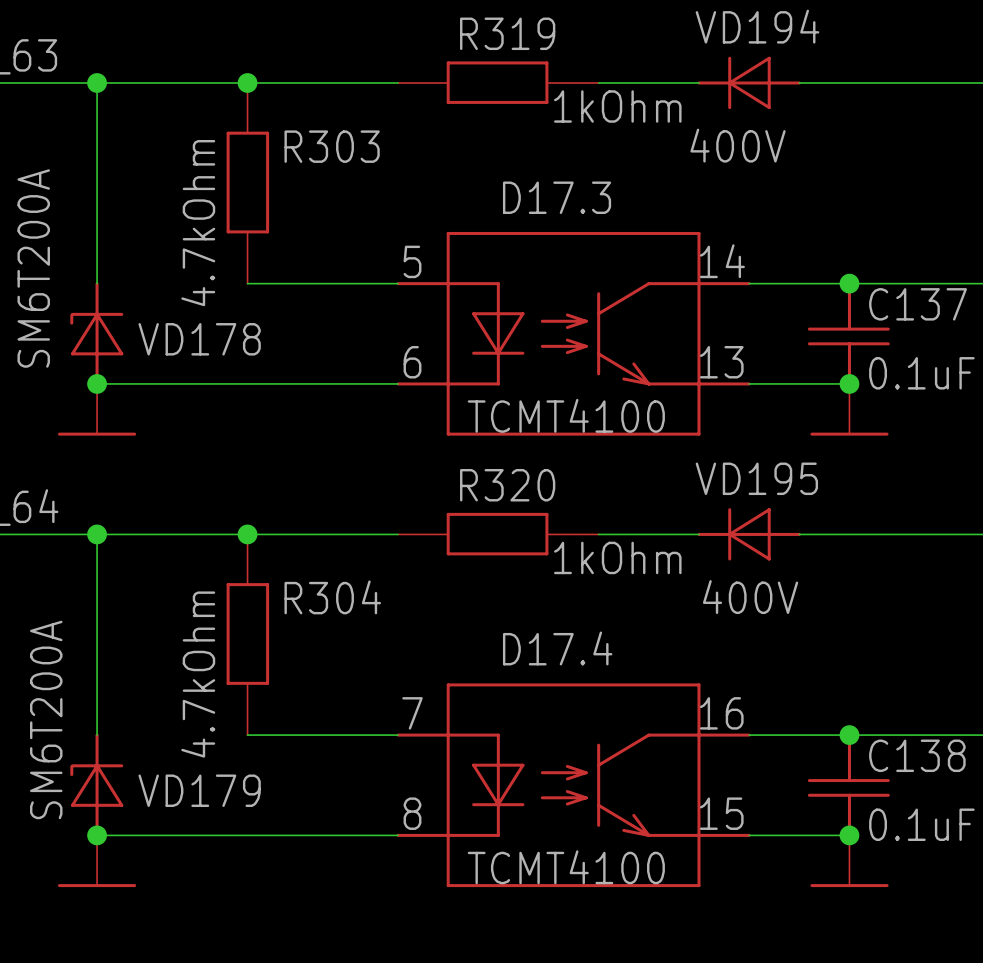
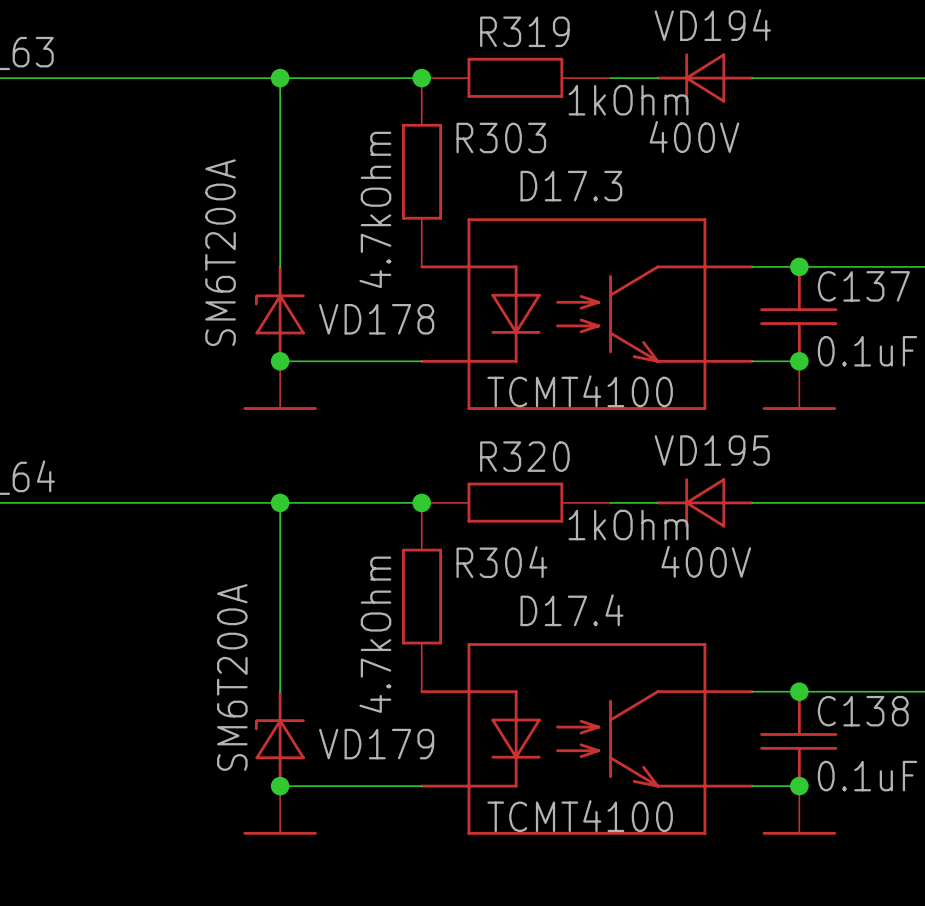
R319 position: (498, 82) -> (516, 77)
wire: (97, 83) (97, 283) -> (280, 78) (280, 266)
junction: (97, 83) -> none
junction position: (247, 83) -> (280, 78)
junction: none -> (421, 78)
R303 position: (247, 183) -> (422, 172)
D17.3 pin number: 5 (412, 261) -> none
D17.3 pin number: 14 (722, 261) -> none
wire: (247, 283) (398, 283) -> none
VD178 position: (96, 333) -> (279, 314)
D17.3 position: (573, 333) -> (586, 314)
D17.3 pin number: 6 (412, 362) -> none
D17.3 pin number: 13 (721, 362) -> none
wire: (97, 383) (297, 383) -> none
junction: (97, 383) -> none
junction: none -> (280, 361)
power symbol position: (97, 409) -> (280, 385)
wire: (97, 534) (97, 735) -> (280, 502) (280, 691)
junction: (97, 534) -> none
junction position: (247, 534) -> (280, 502)
junction: none -> (421, 502)
R320 position: (498, 534) -> (516, 502)
R304 position: (247, 634) -> (422, 597)
D17.4 pin number: 7 (412, 713) -> none
D17.4 pin number: 16 (721, 713) -> none
wire: (247, 735) (398, 735) -> none
VD179 position: (96, 785) -> (279, 738)
D17.4 position: (573, 785) -> (586, 738)
D17.4 pin number: 8 (412, 813) -> none
D17.4 pin number: 15 (721, 813) -> none
wire: (97, 835) (297, 835) -> none
junction: (97, 835) -> none
junction: none -> (280, 786)
power symbol position: (97, 861) -> (280, 810)

